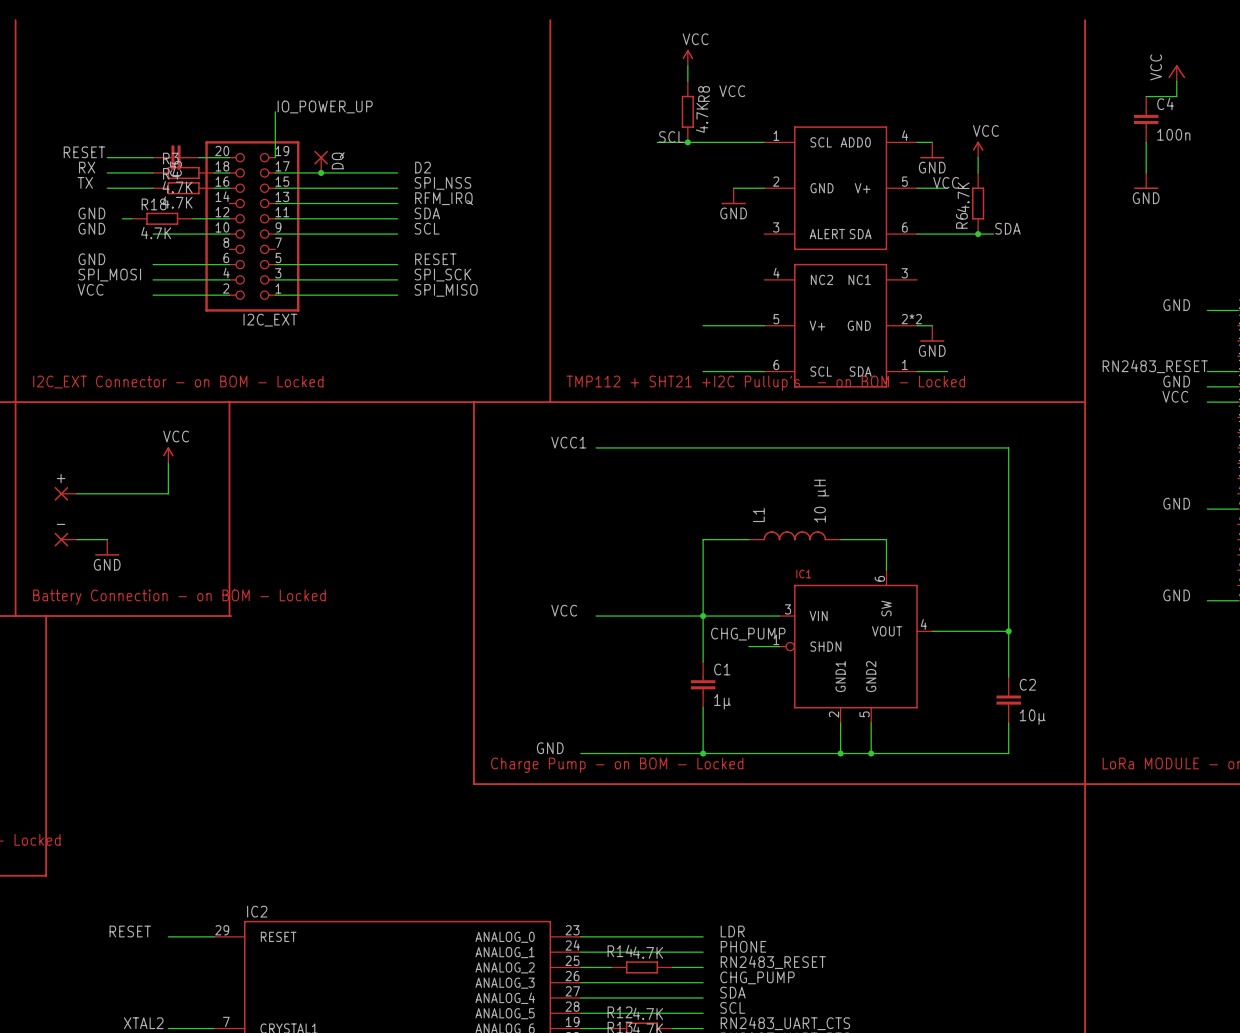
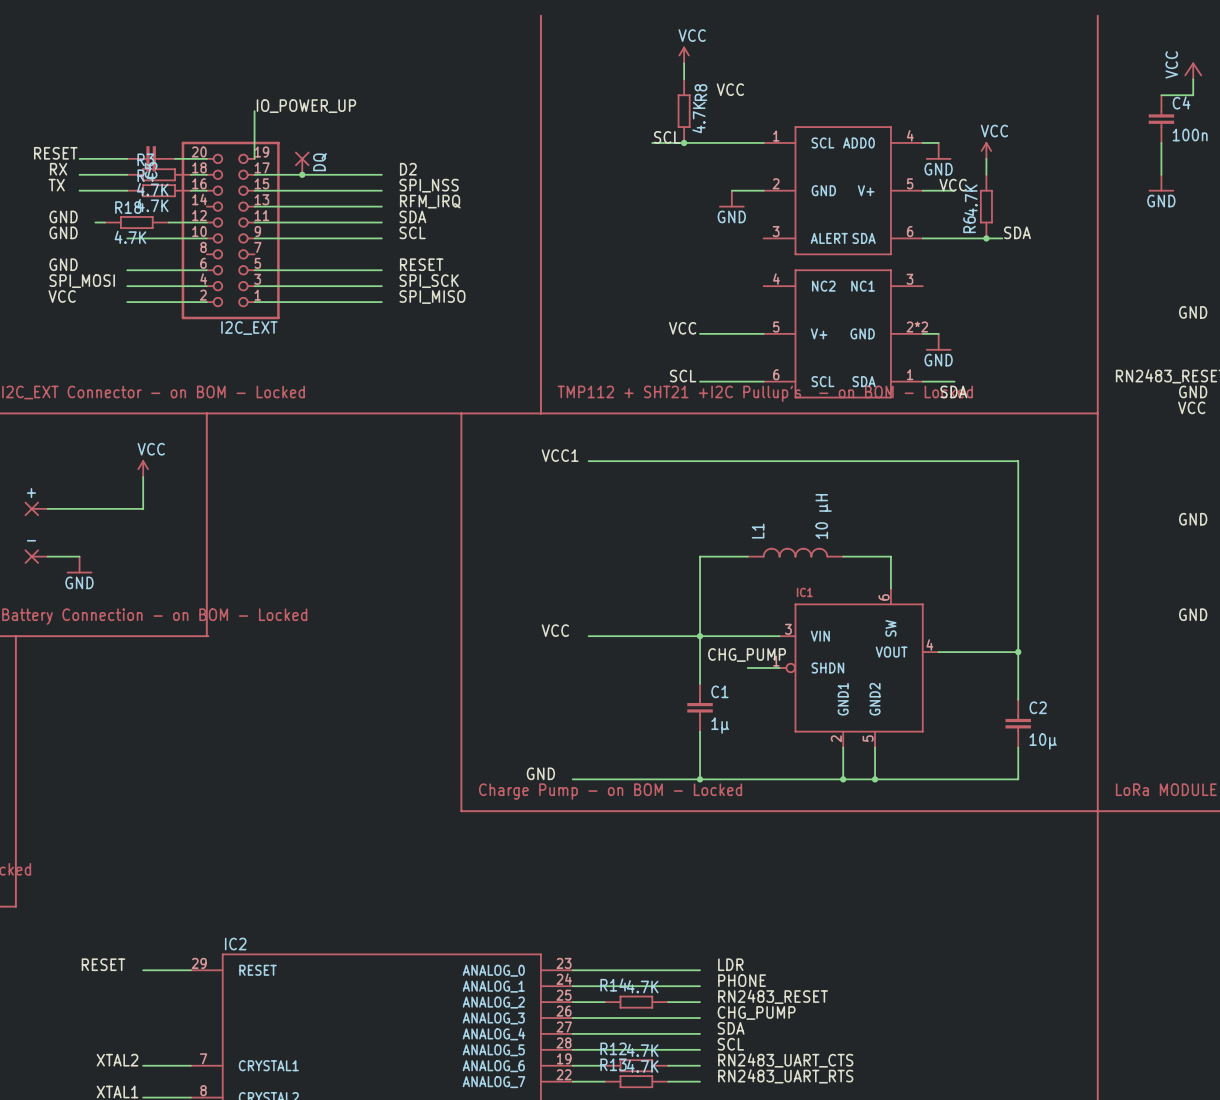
label: none -> VCC (682, 328)
label: none -> SCL (683, 376)
label: none -> SDA (953, 391)

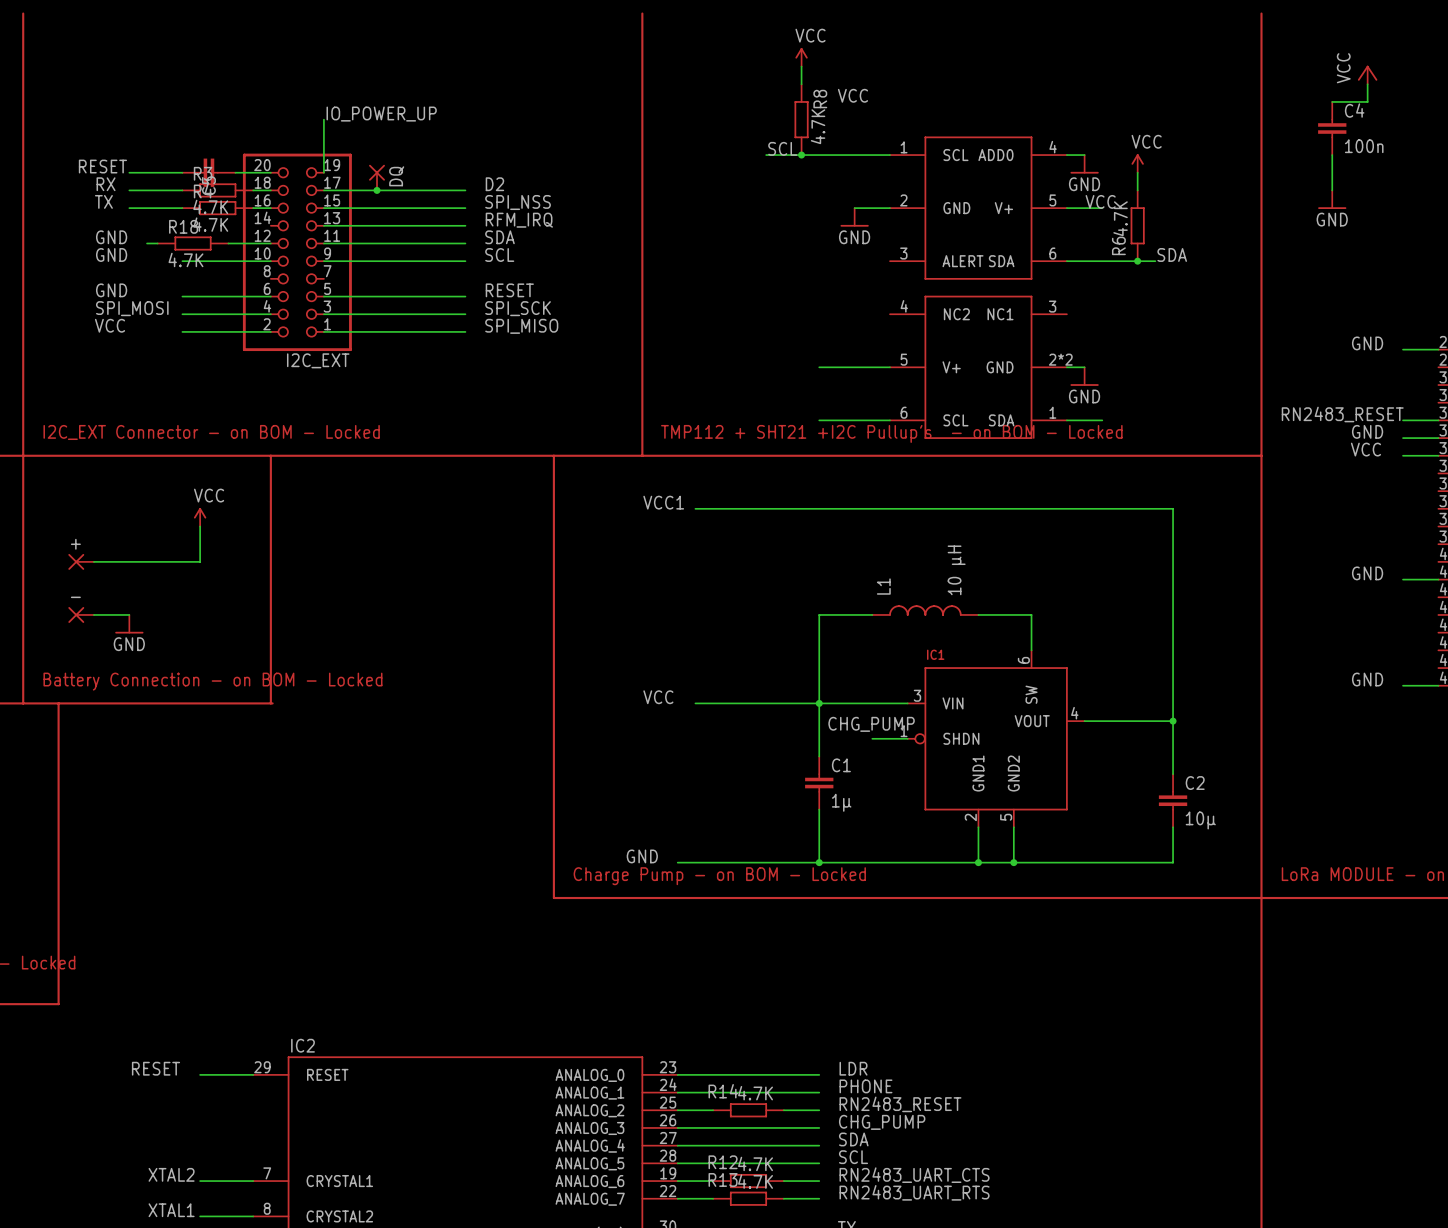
label: VCC (682, 328) -> none
label: SCL (683, 376) -> none
label: SDA (953, 391) -> none

